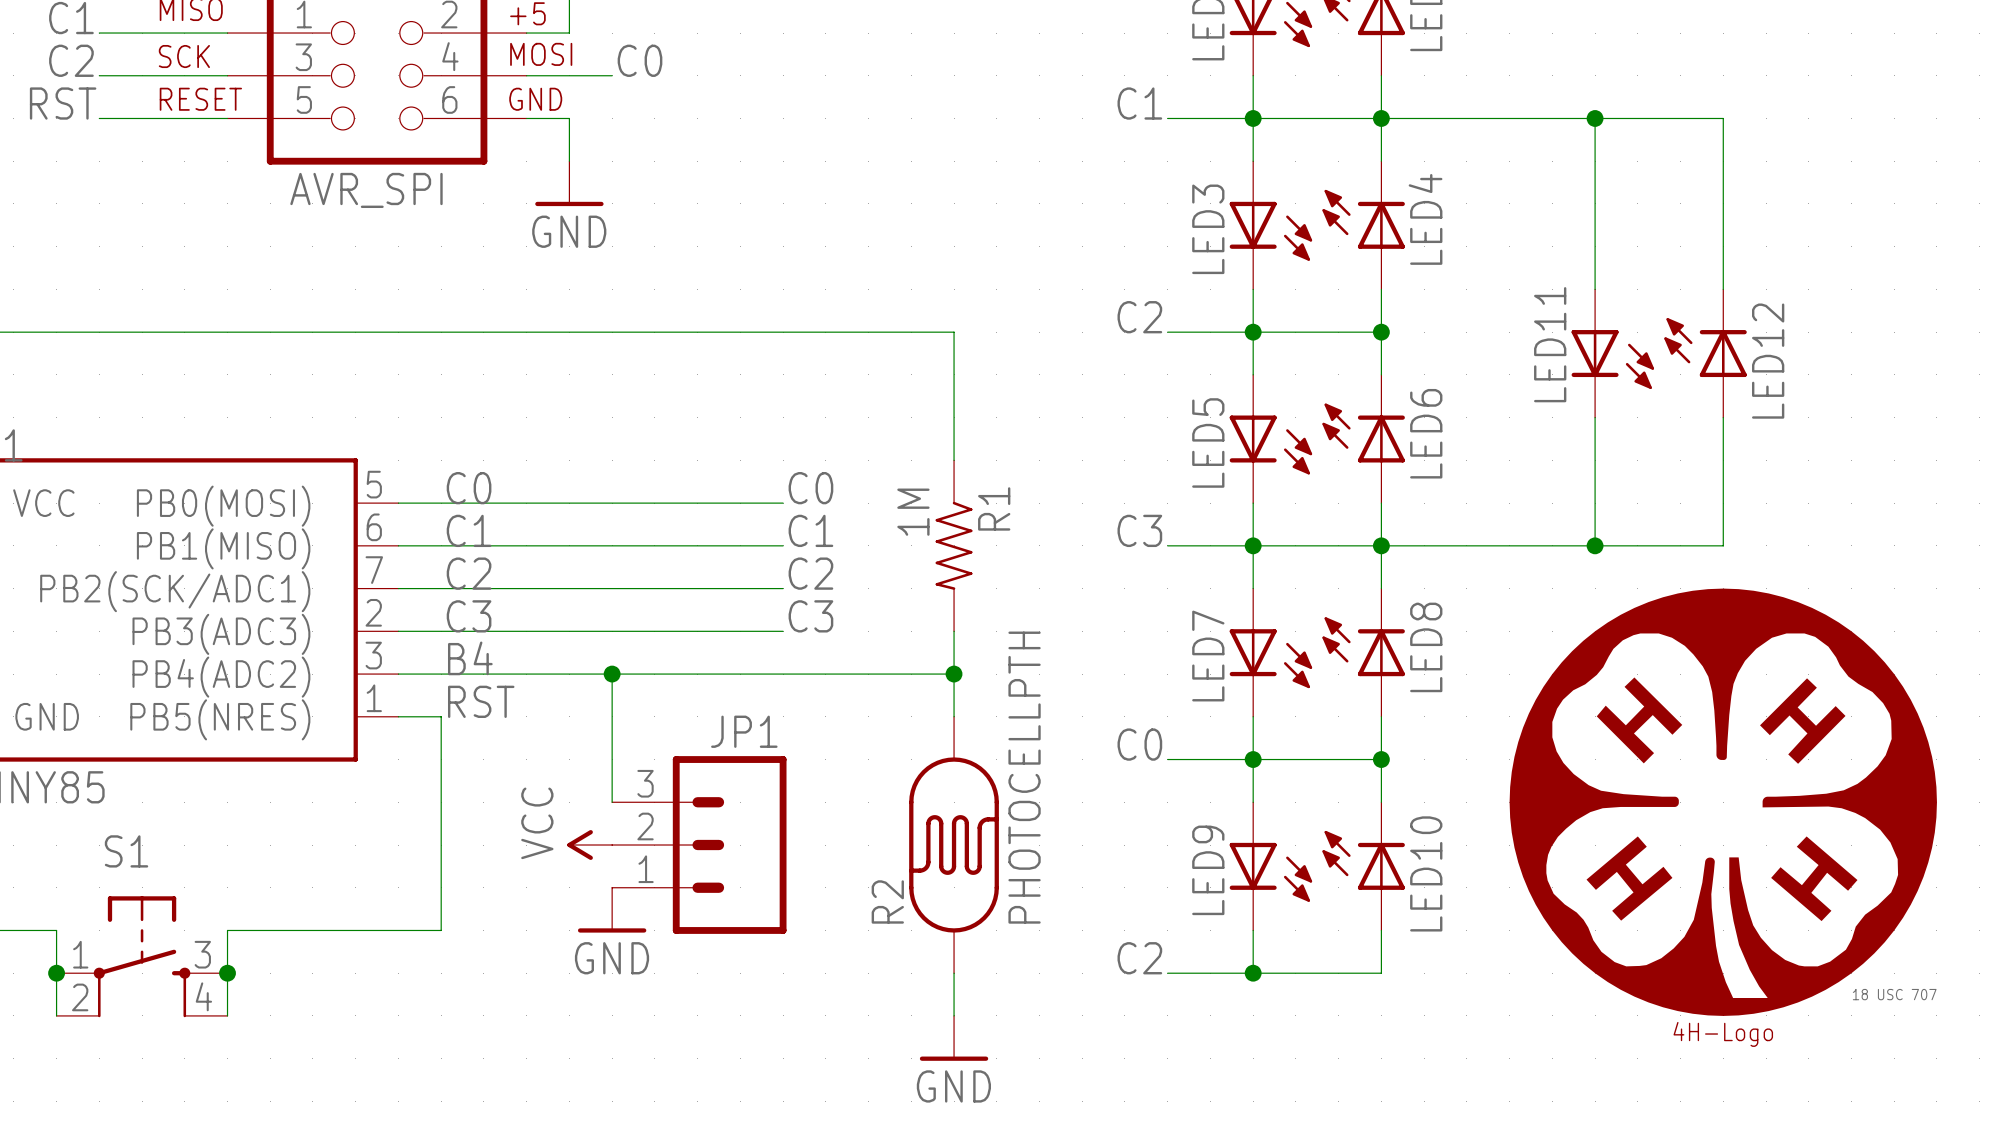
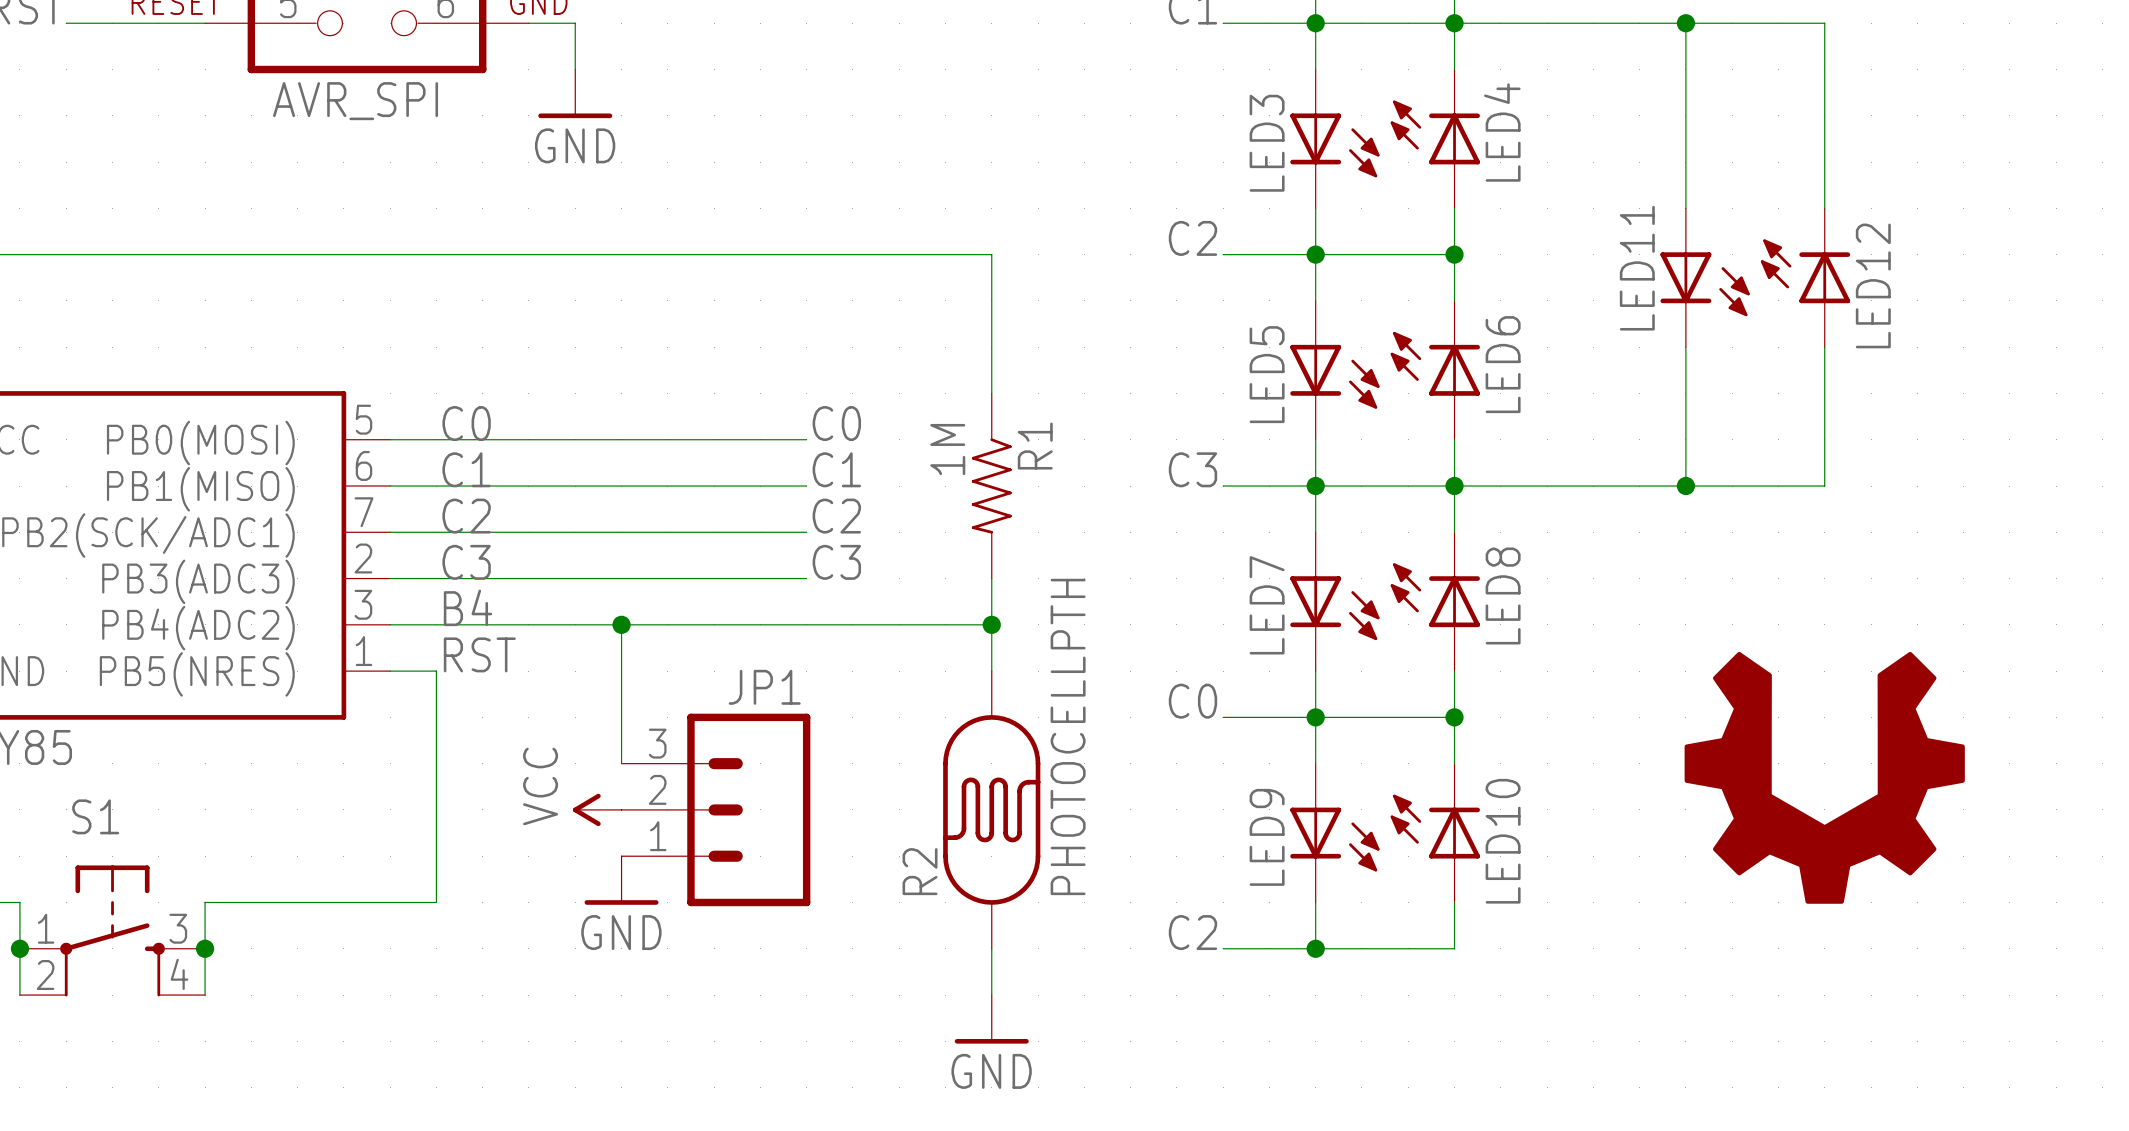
part symbol: [1509, 588, 1937, 1016] -> [1684, 651, 1965, 904]
part value: 18 USC 707 (1894, 994) -> none

